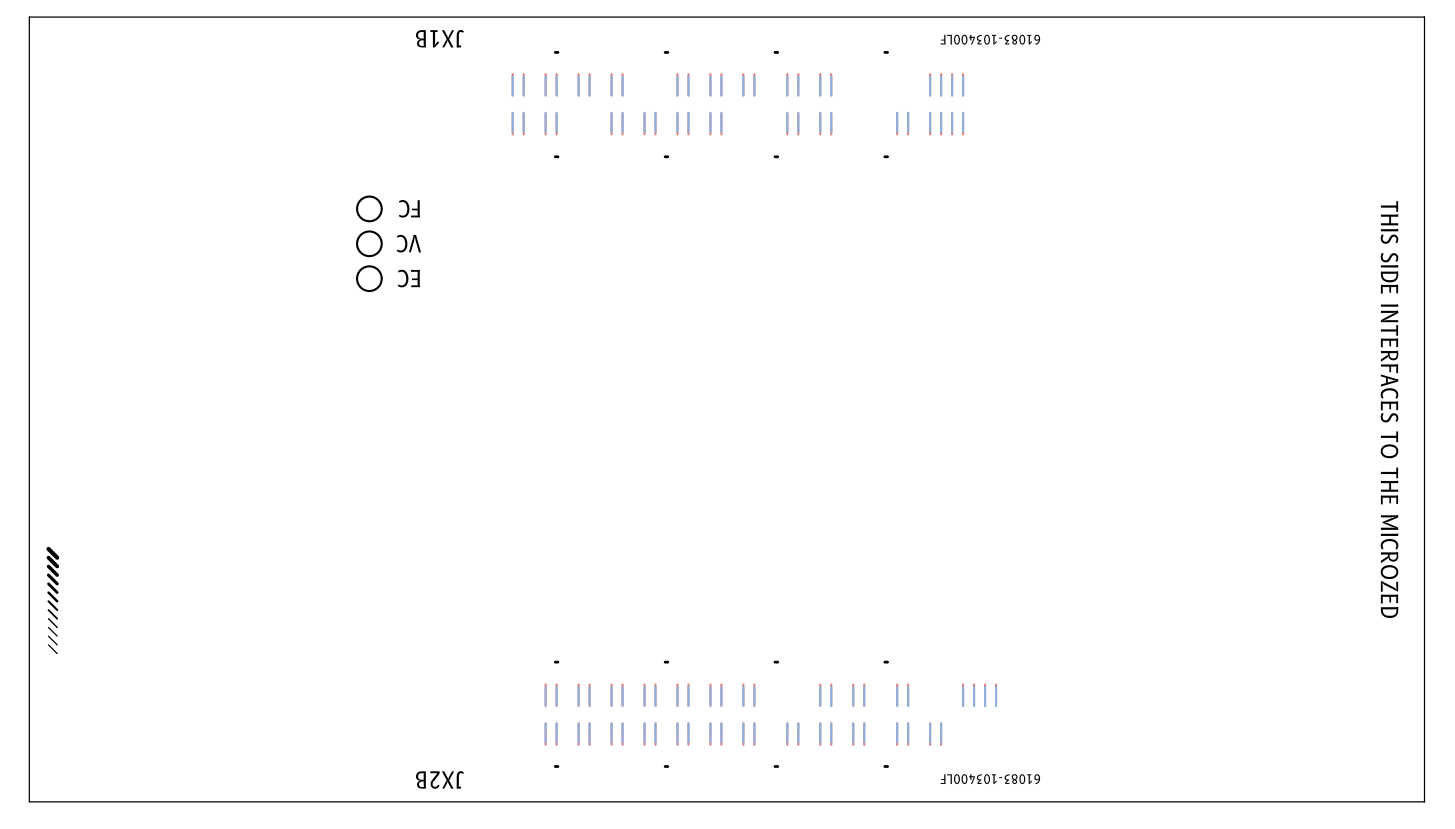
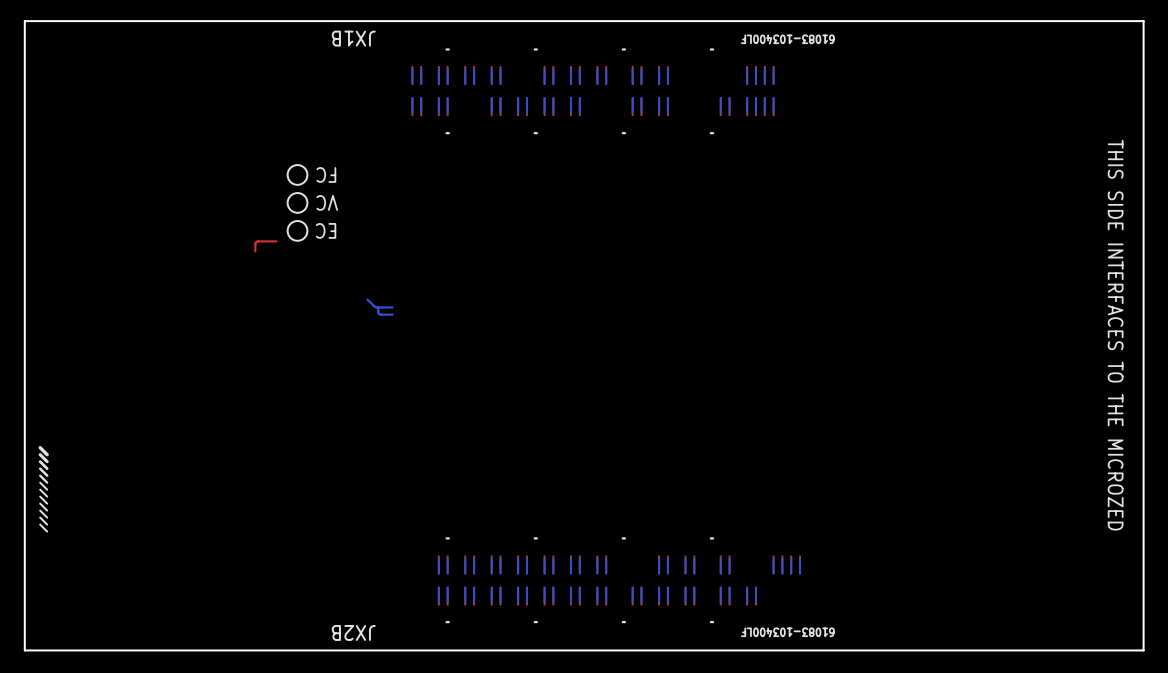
top track: none -> (276, 241) (257, 241) (255, 251)
bottom track: none -> (367, 299) (375, 307) (392, 307)
bottom track: none -> (378, 307) (379, 314) (392, 314)

